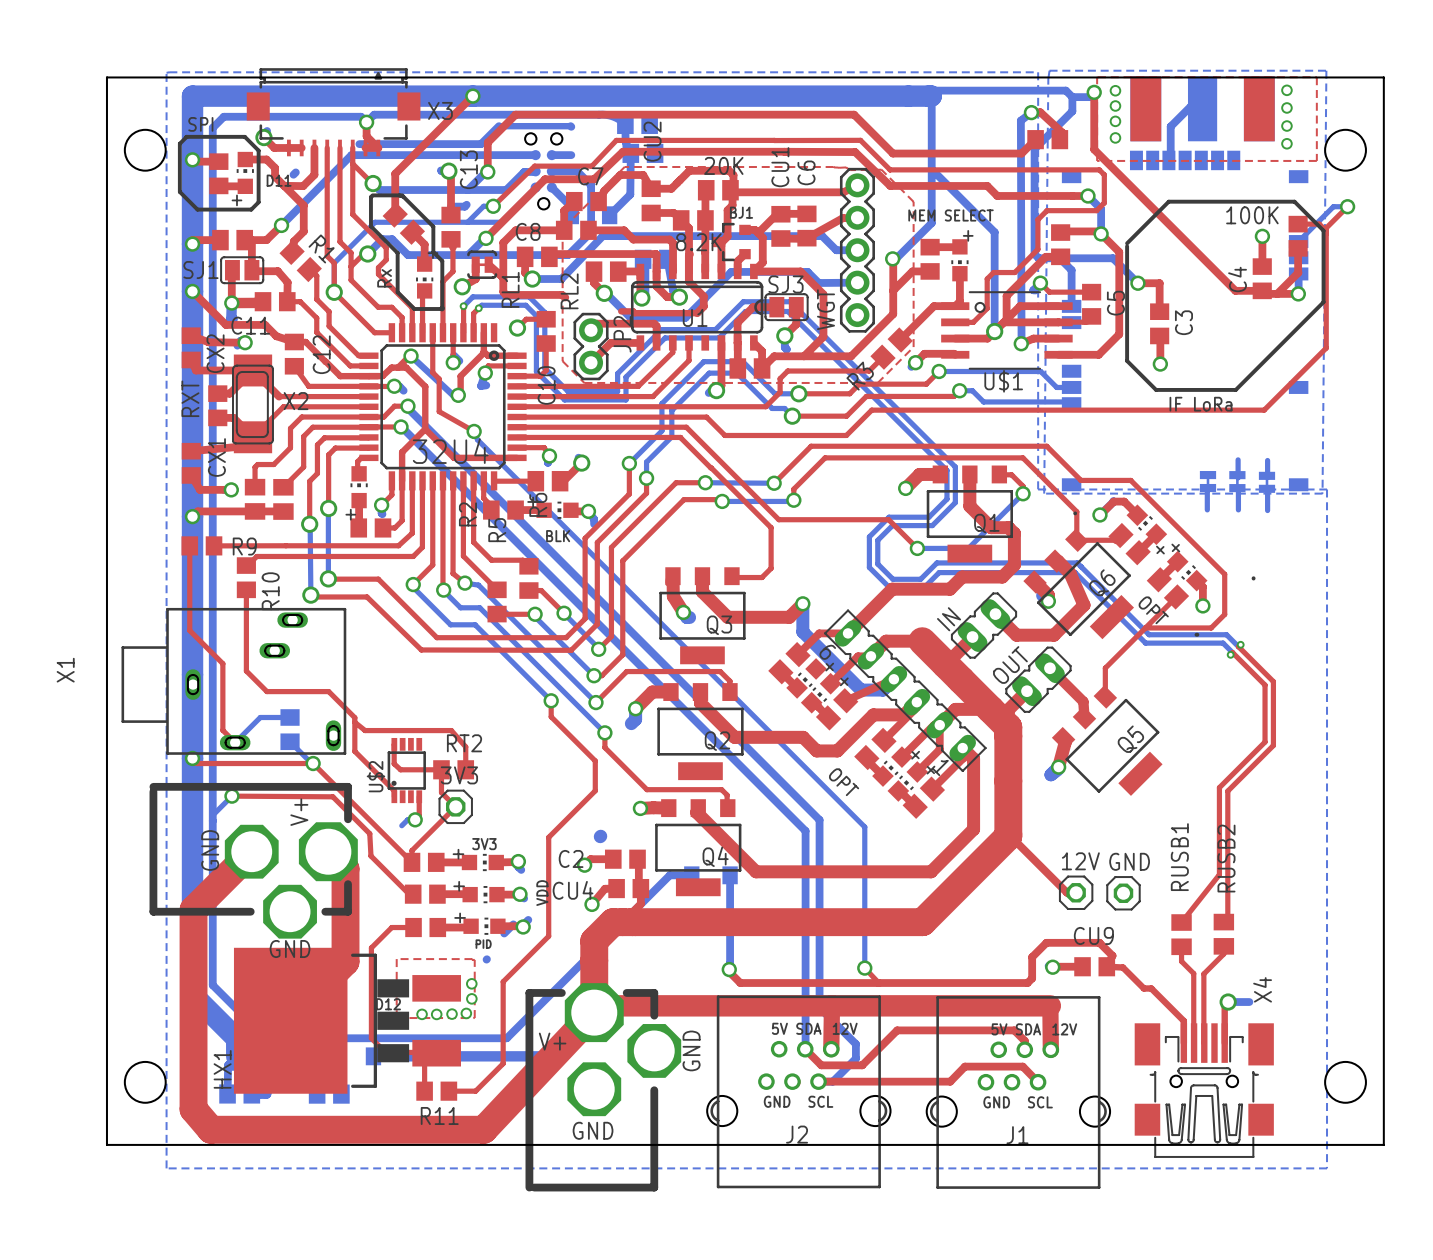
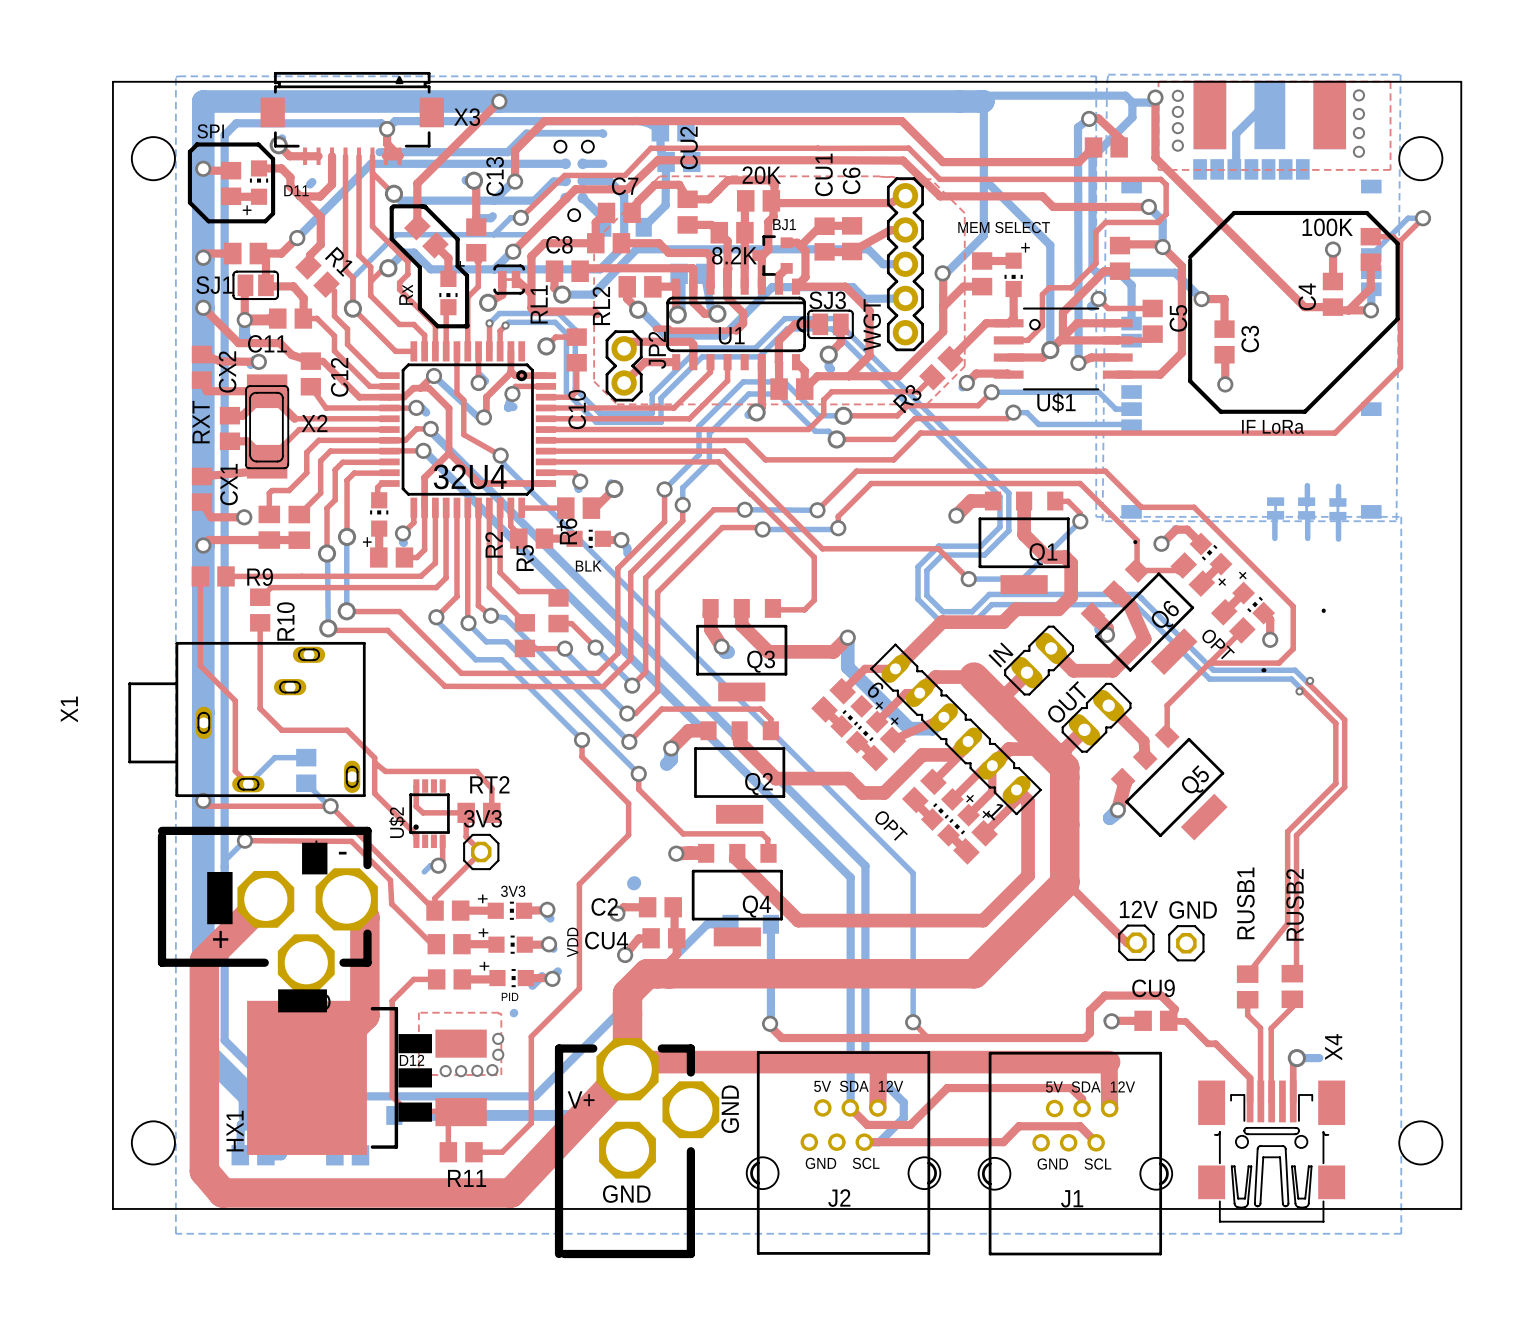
drawing: none -> [302, 842, 328, 875]
text: none -> - (342, 853)
drawing: none -> [207, 871, 233, 925]
text: none -> + (220, 939)
drawing: none -> [278, 989, 327, 1013]

